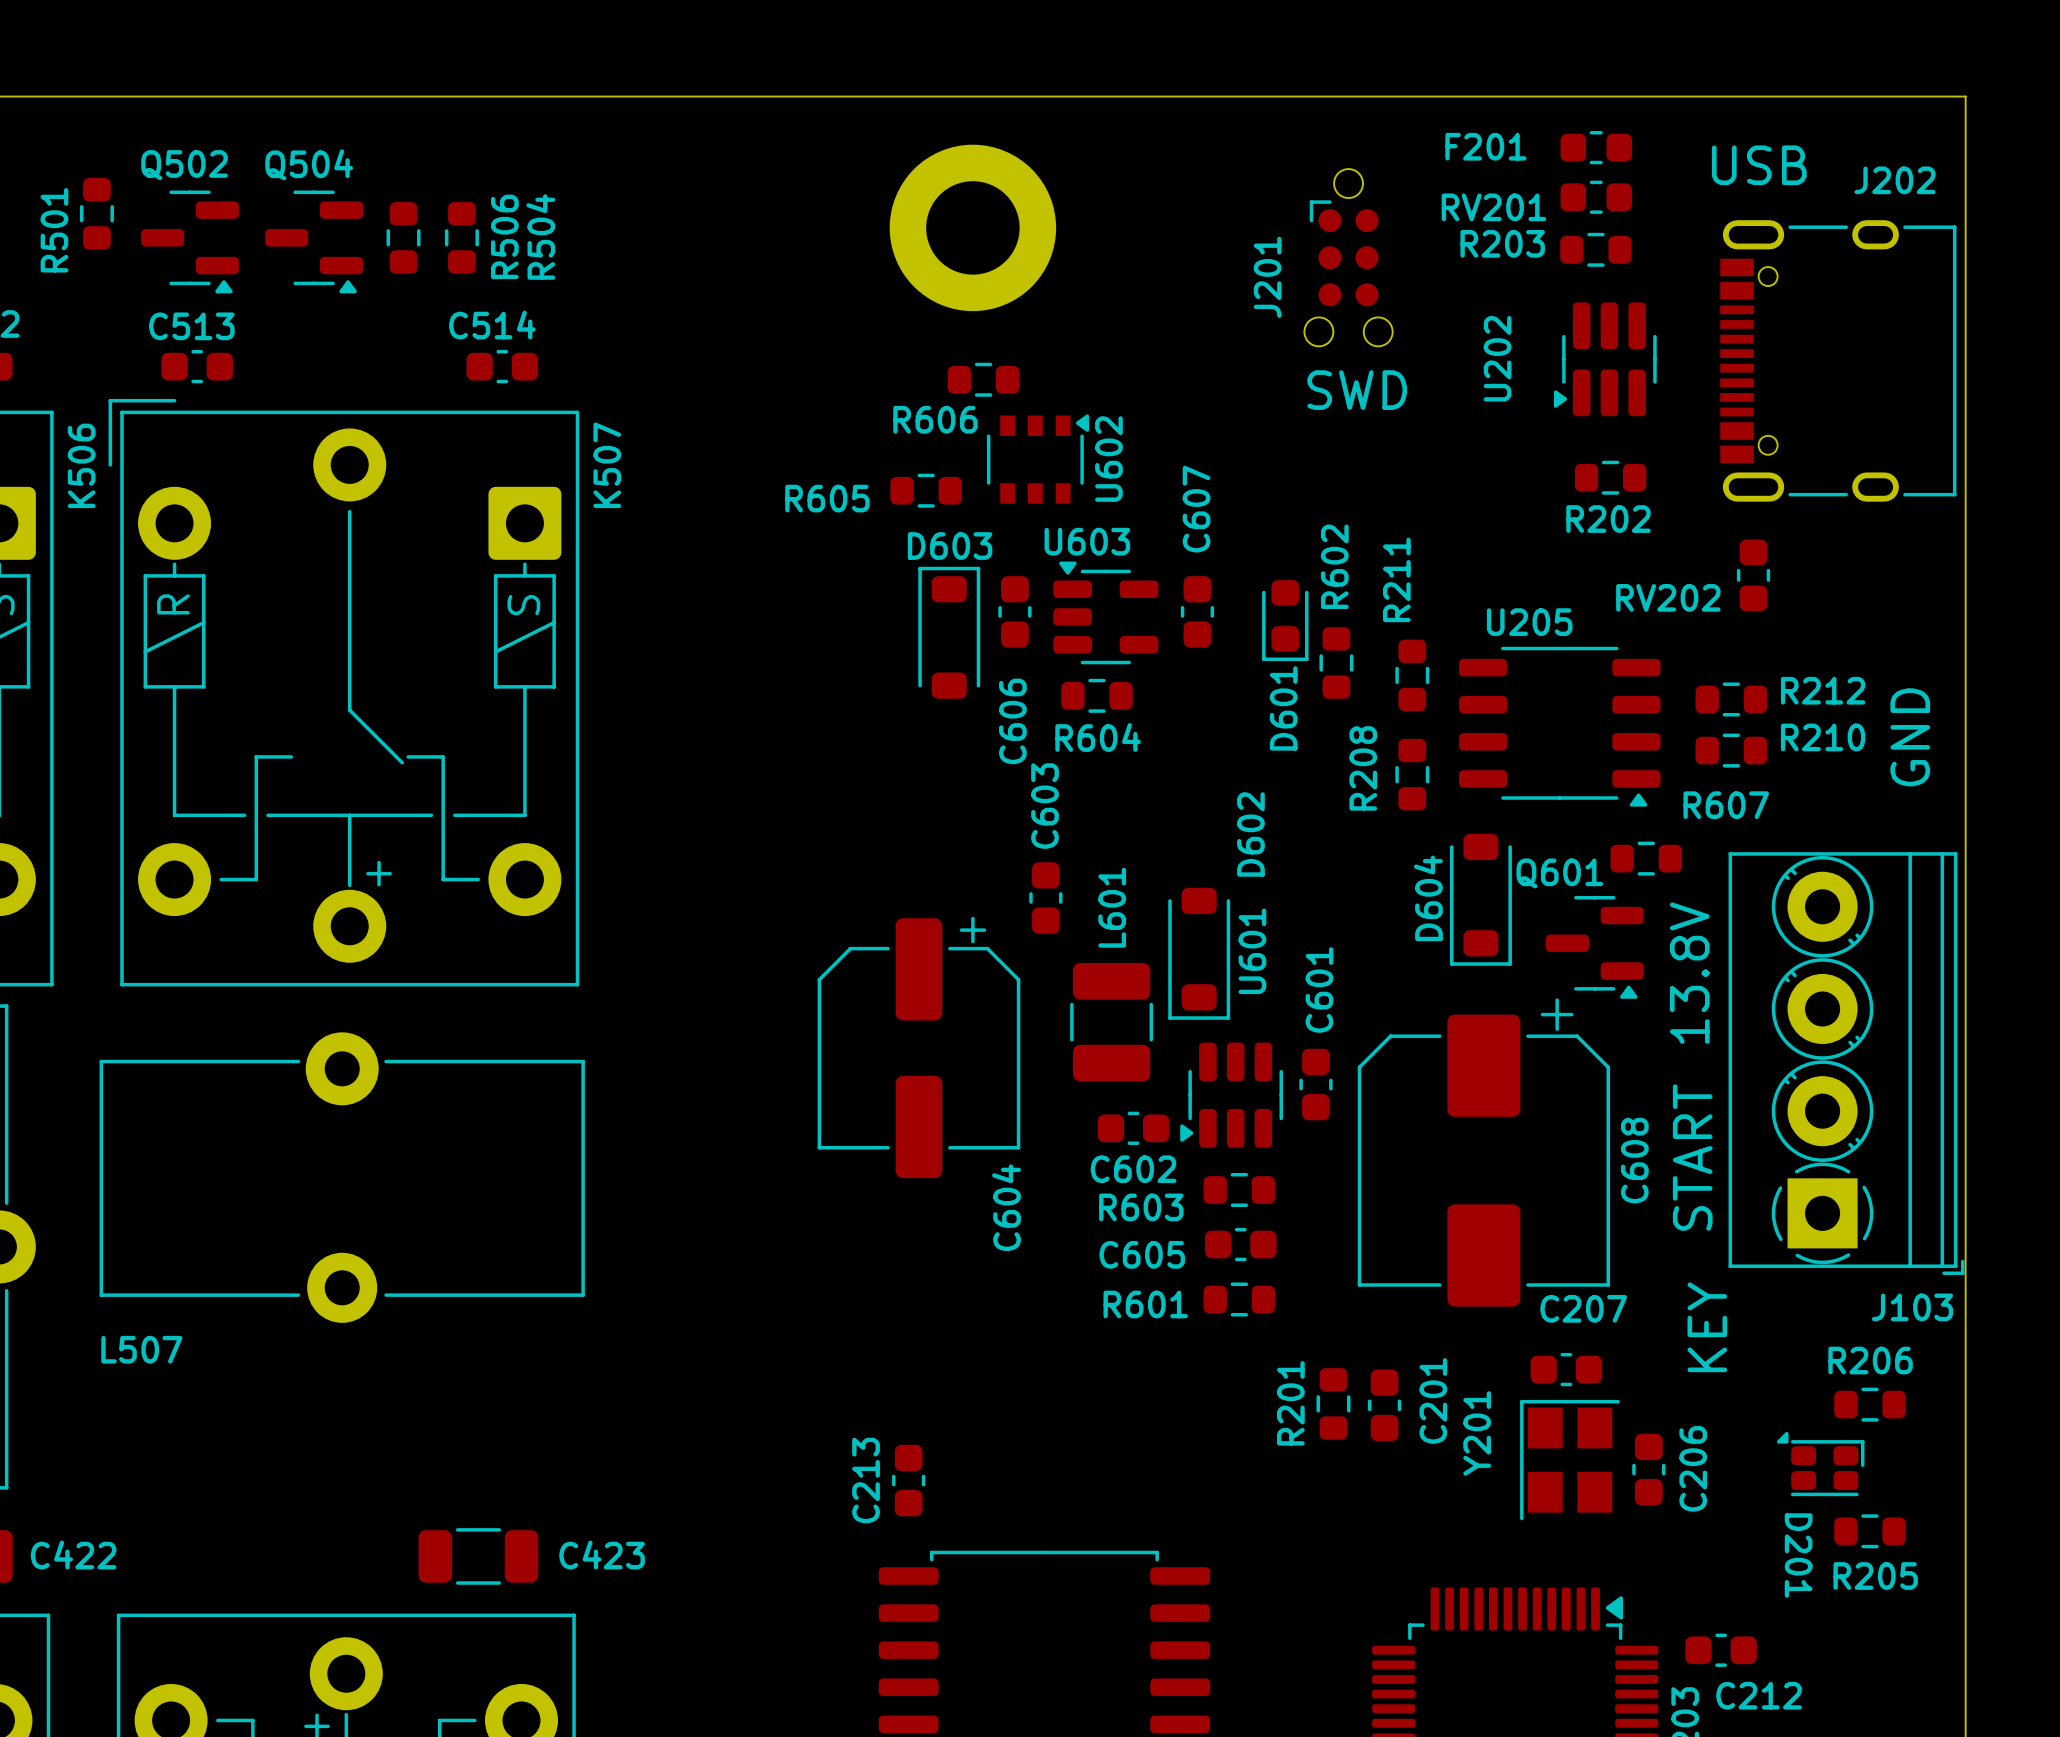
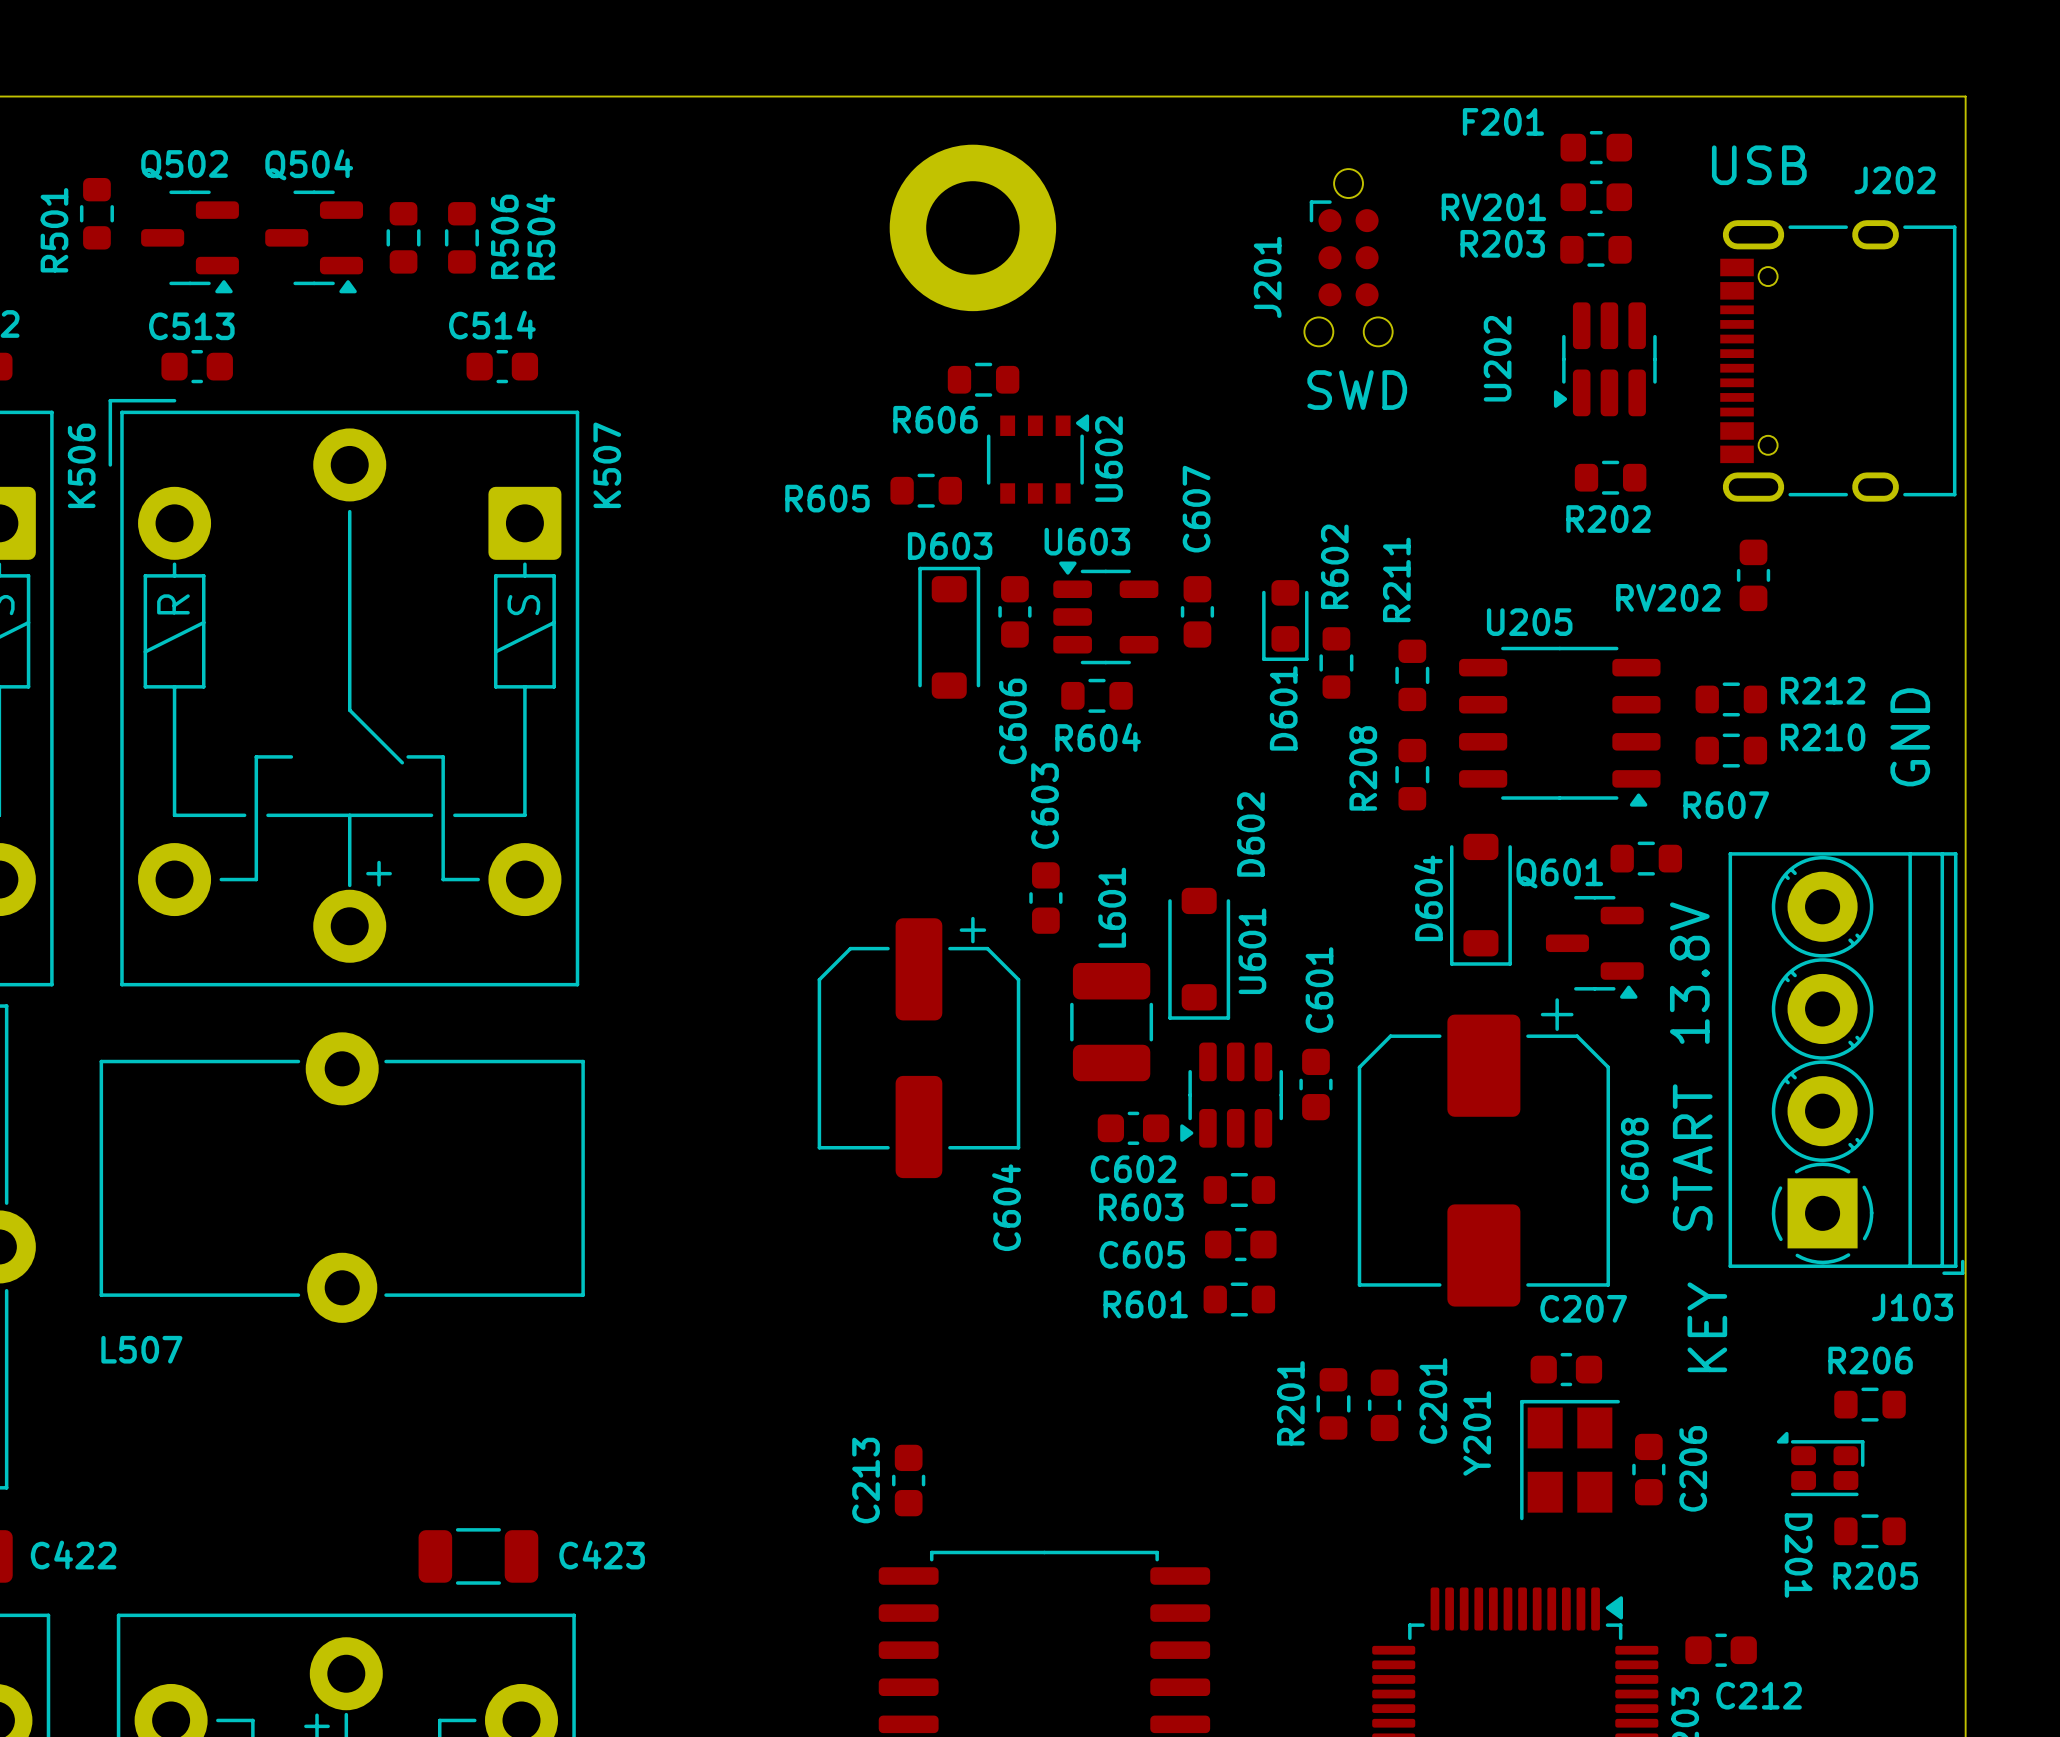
F201 name position: F201 (1485, 146) -> F201 (1503, 121)

